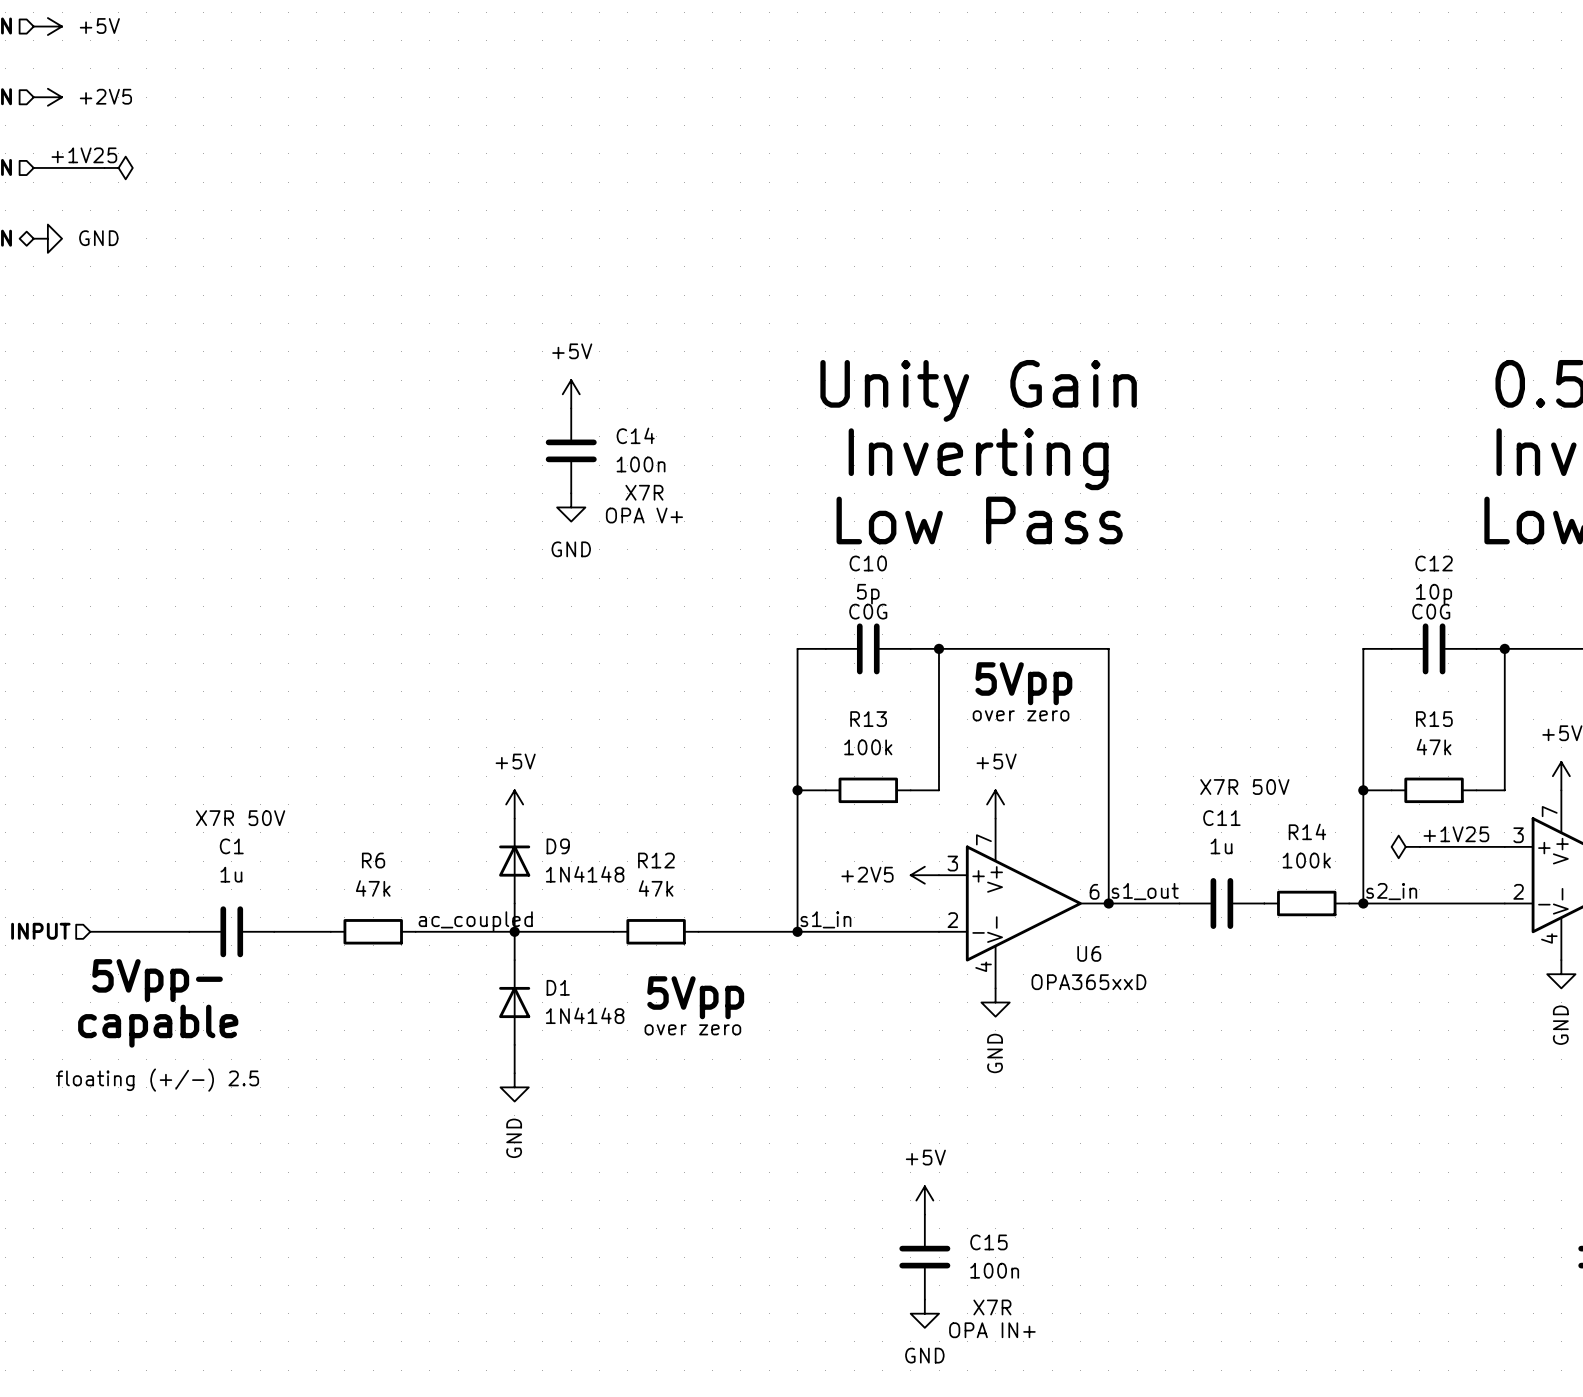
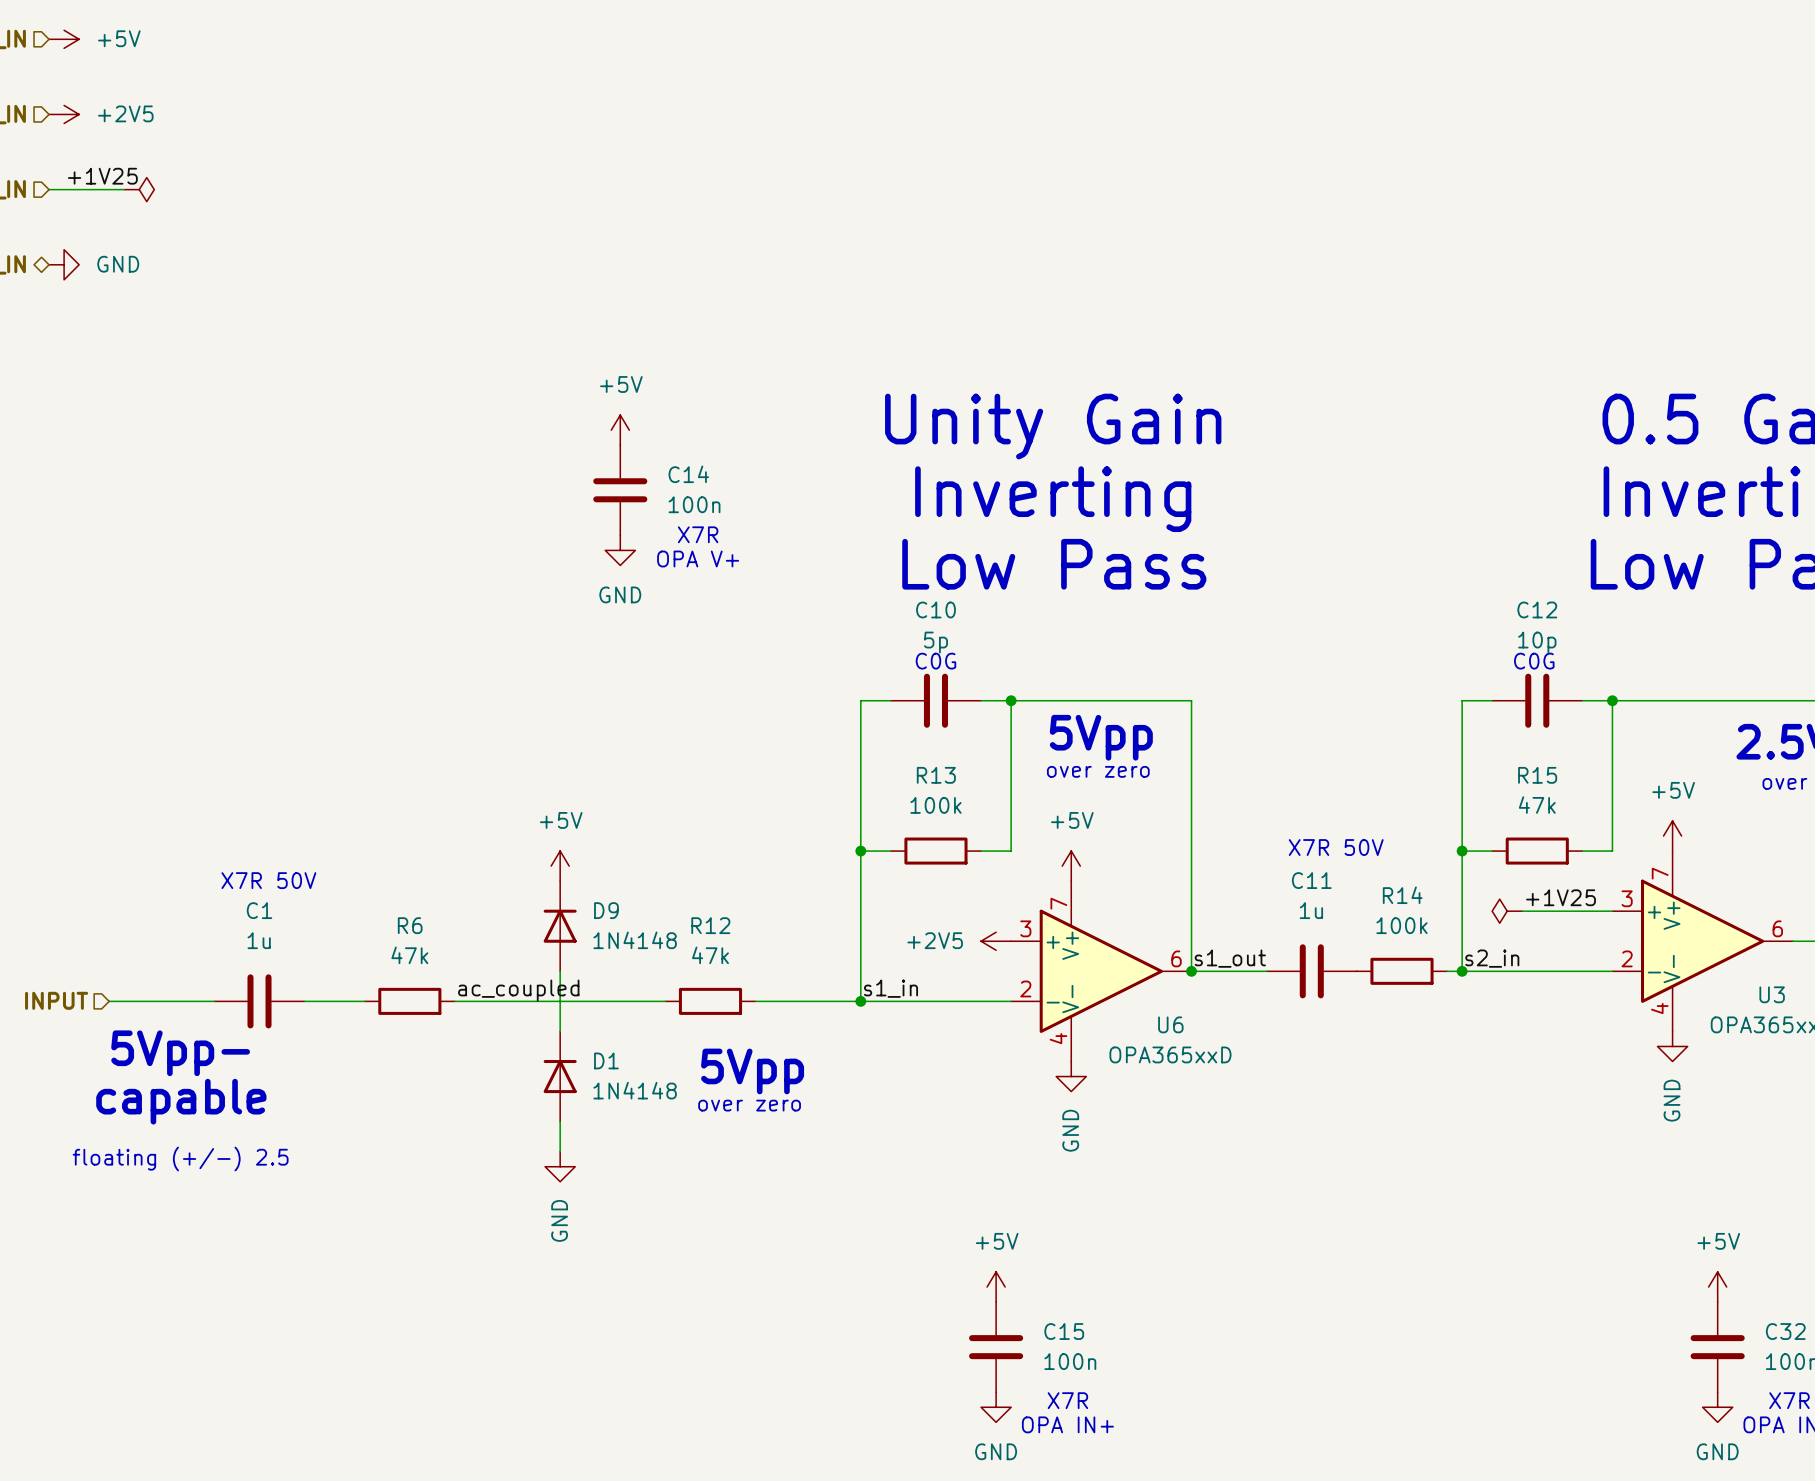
junction: (514, 931) -> none

